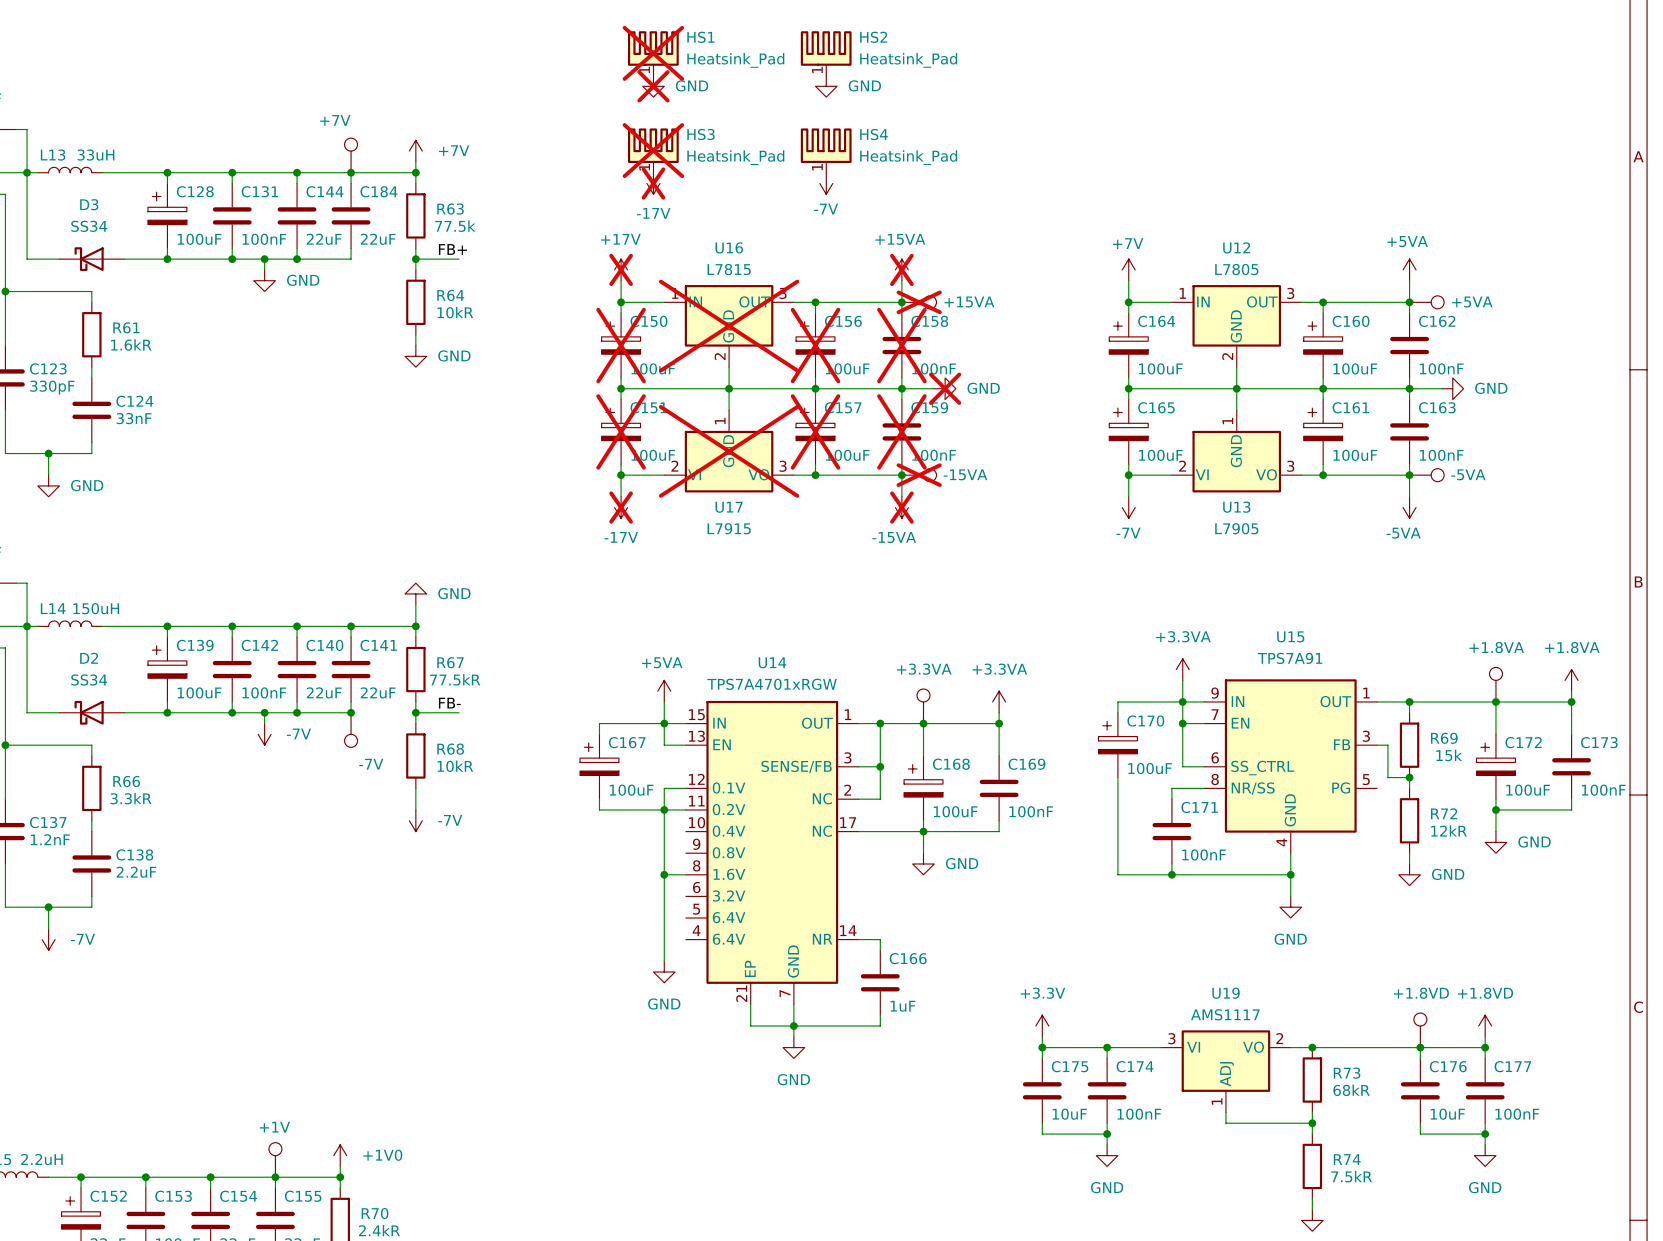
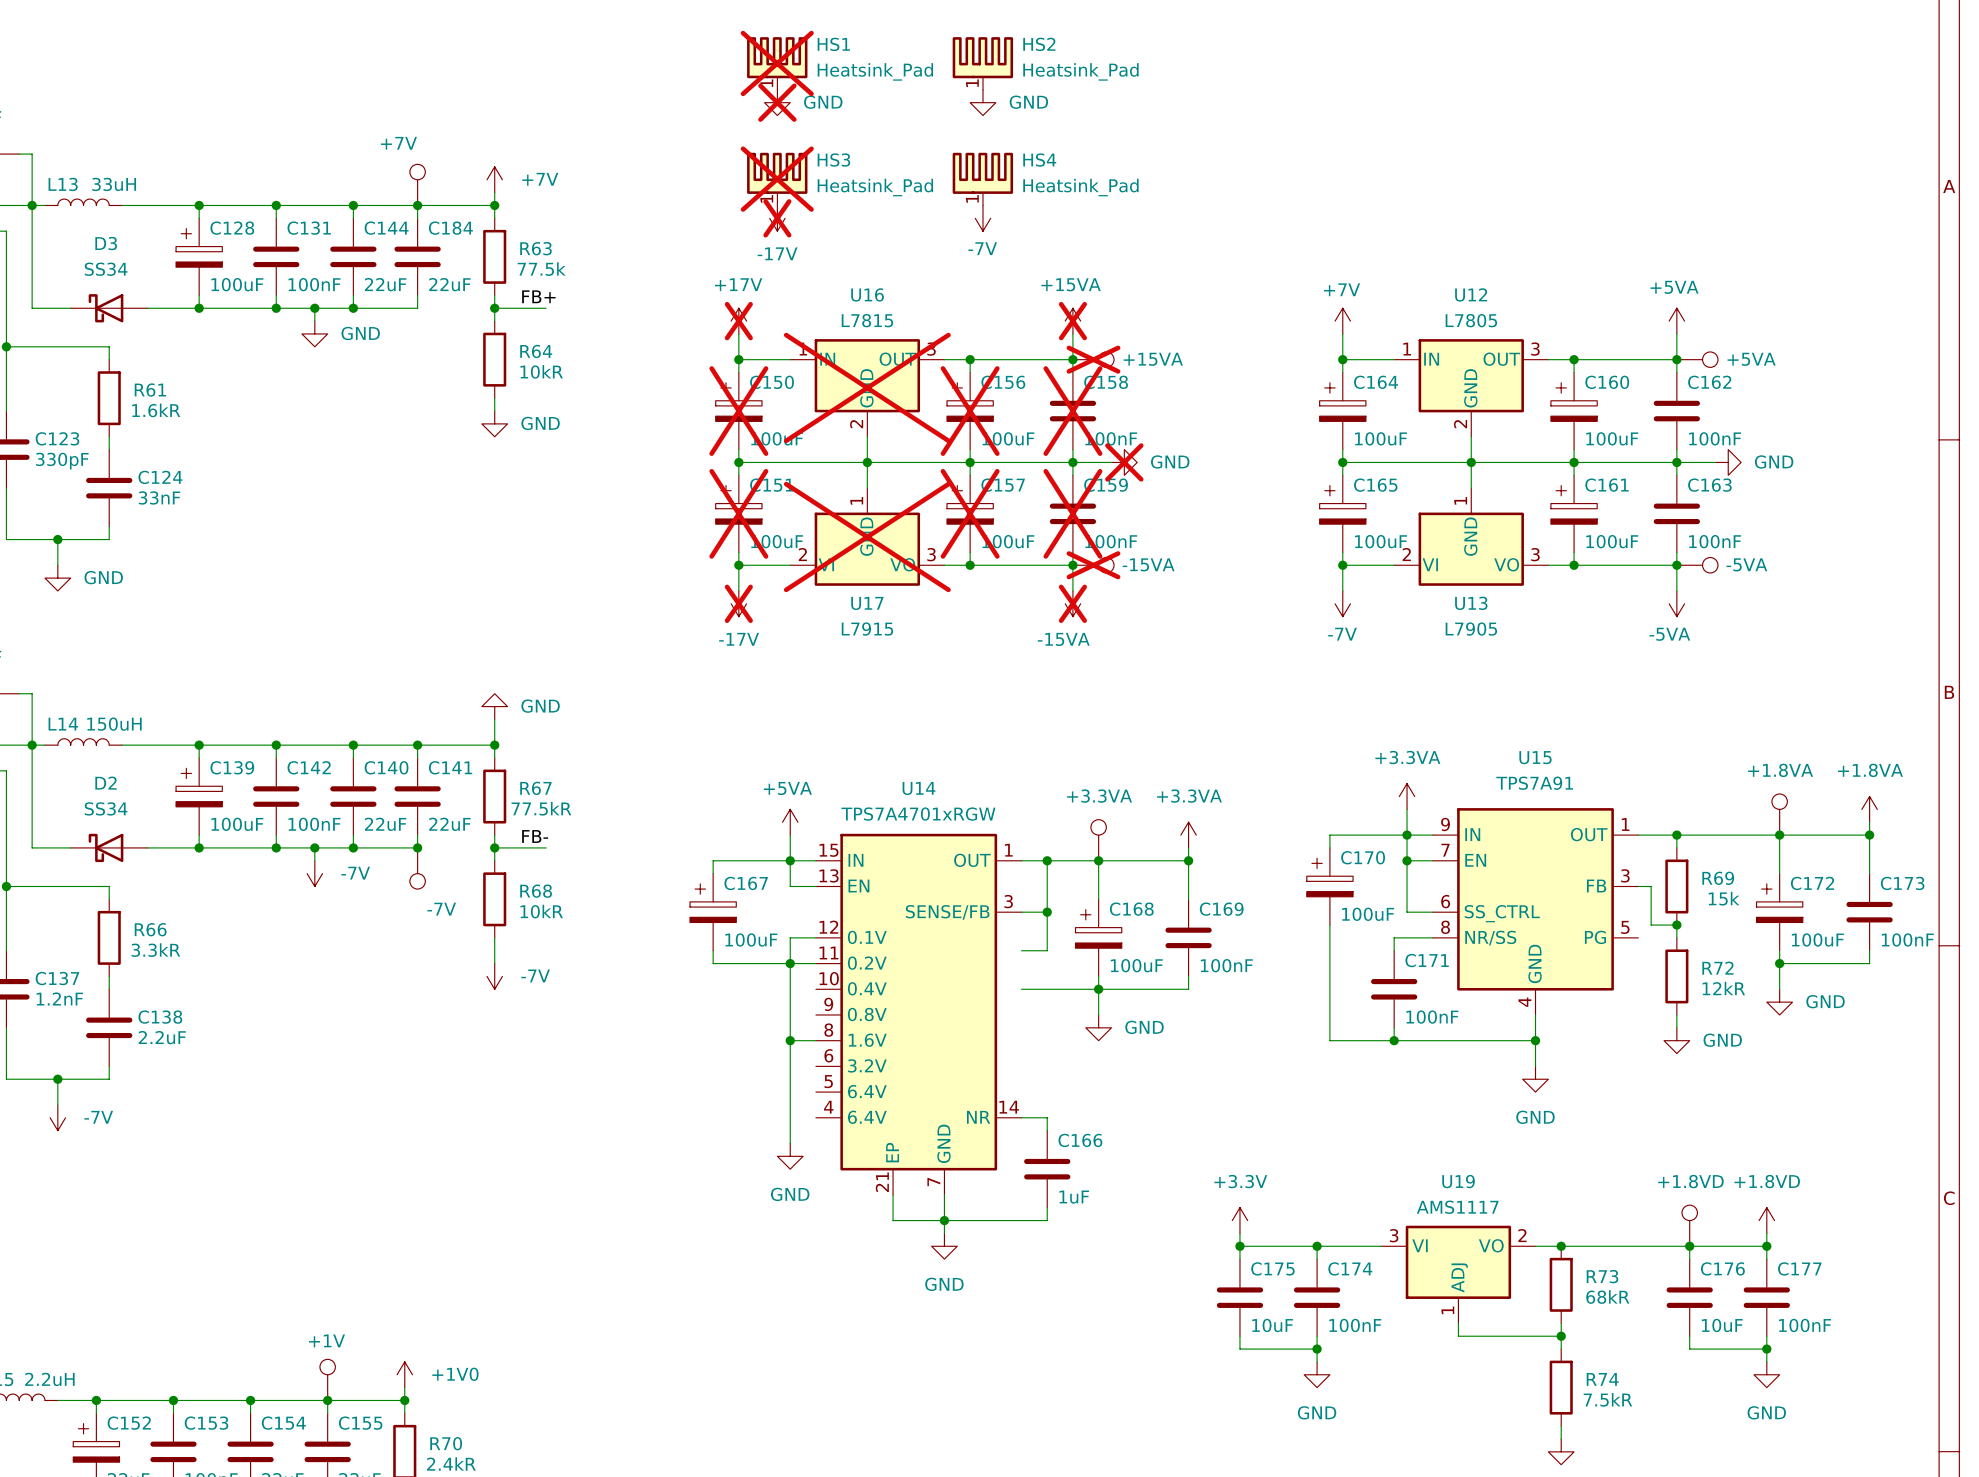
U14 symbol: [685, 700, 859, 1005] -> [815, 833, 1022, 1195]

